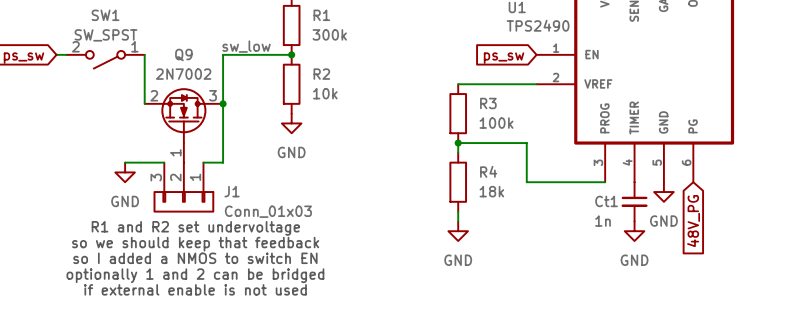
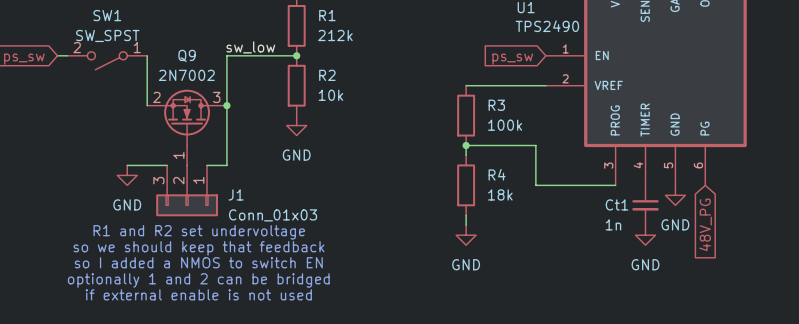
R1 value: 300k (329, 34) -> 212k (335, 35)

